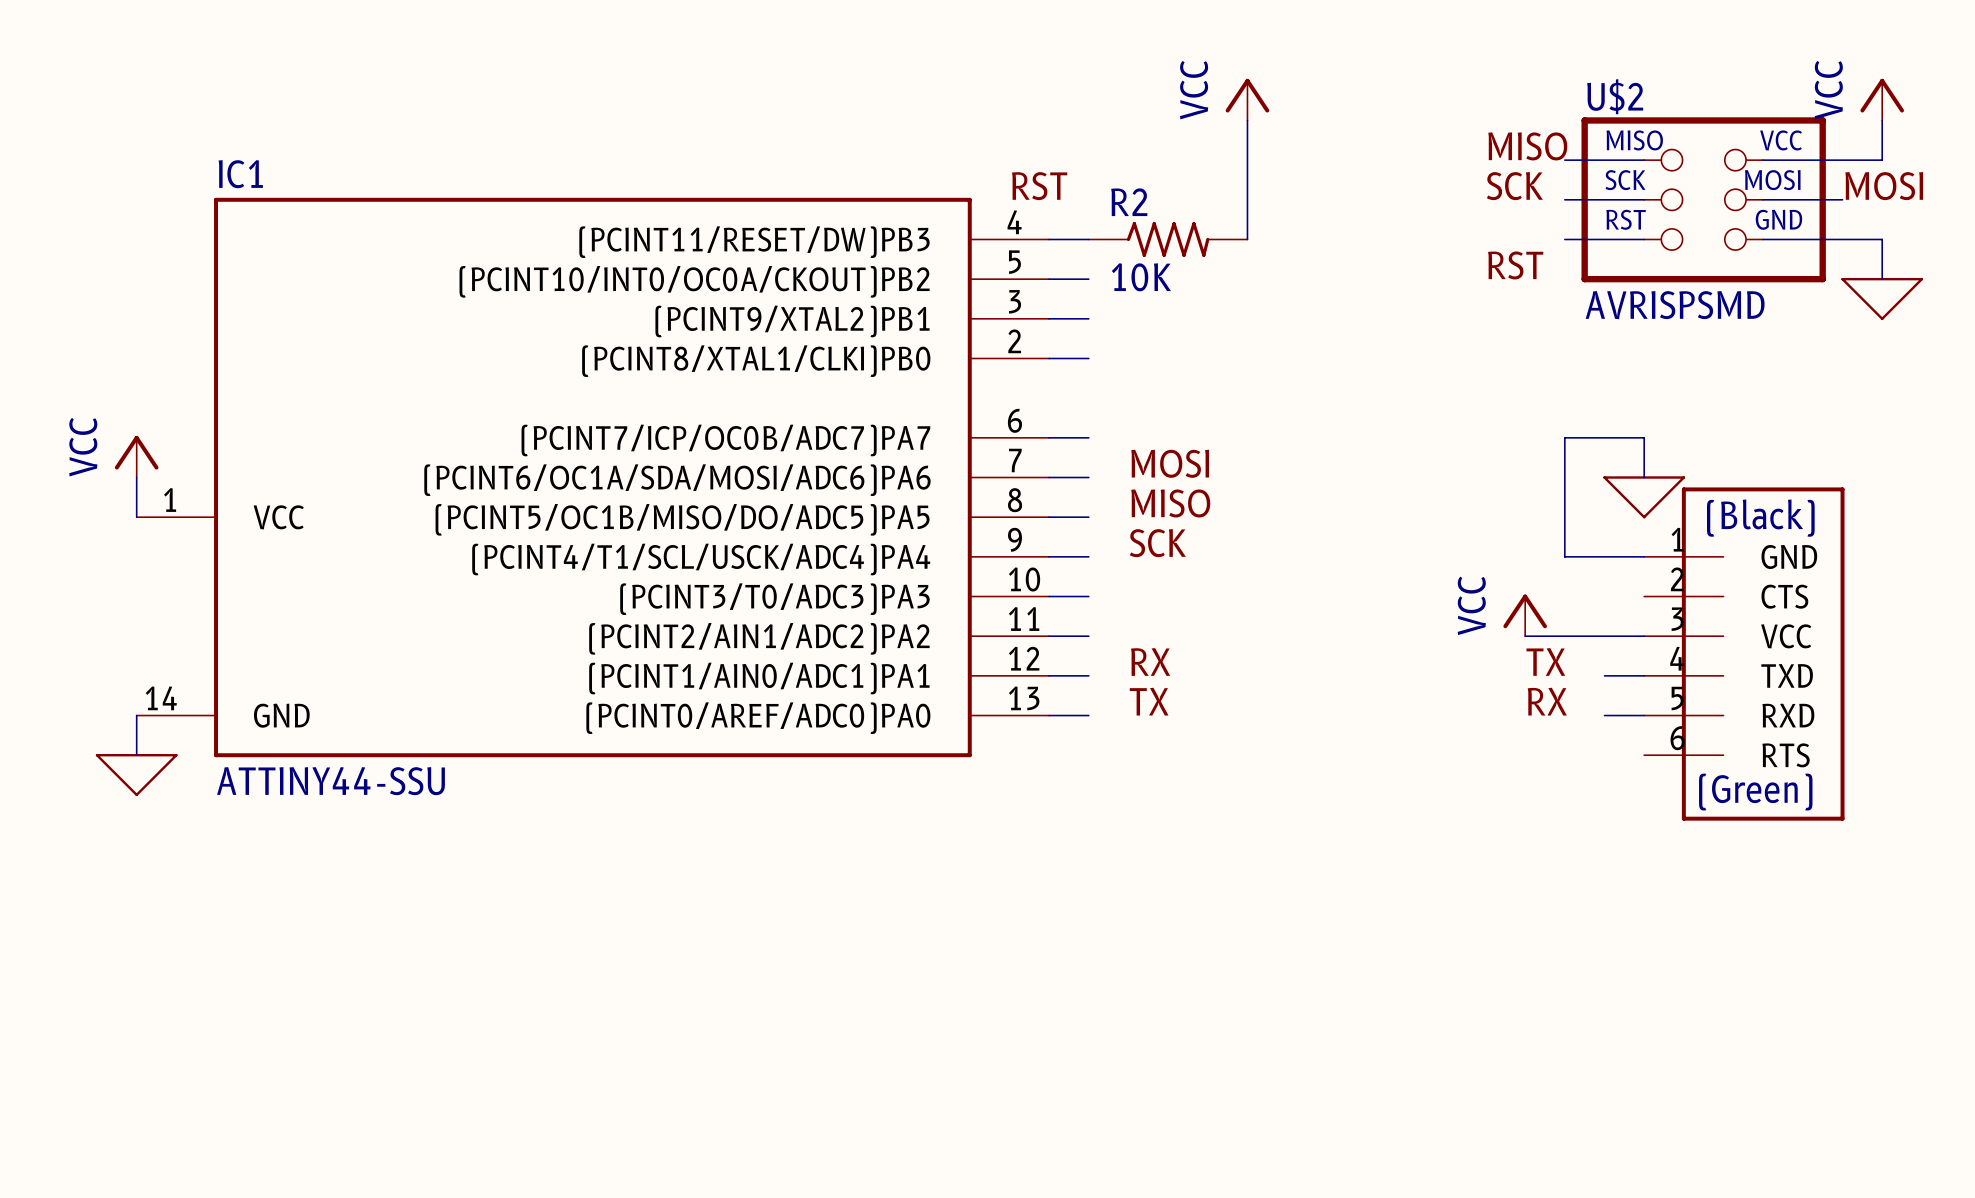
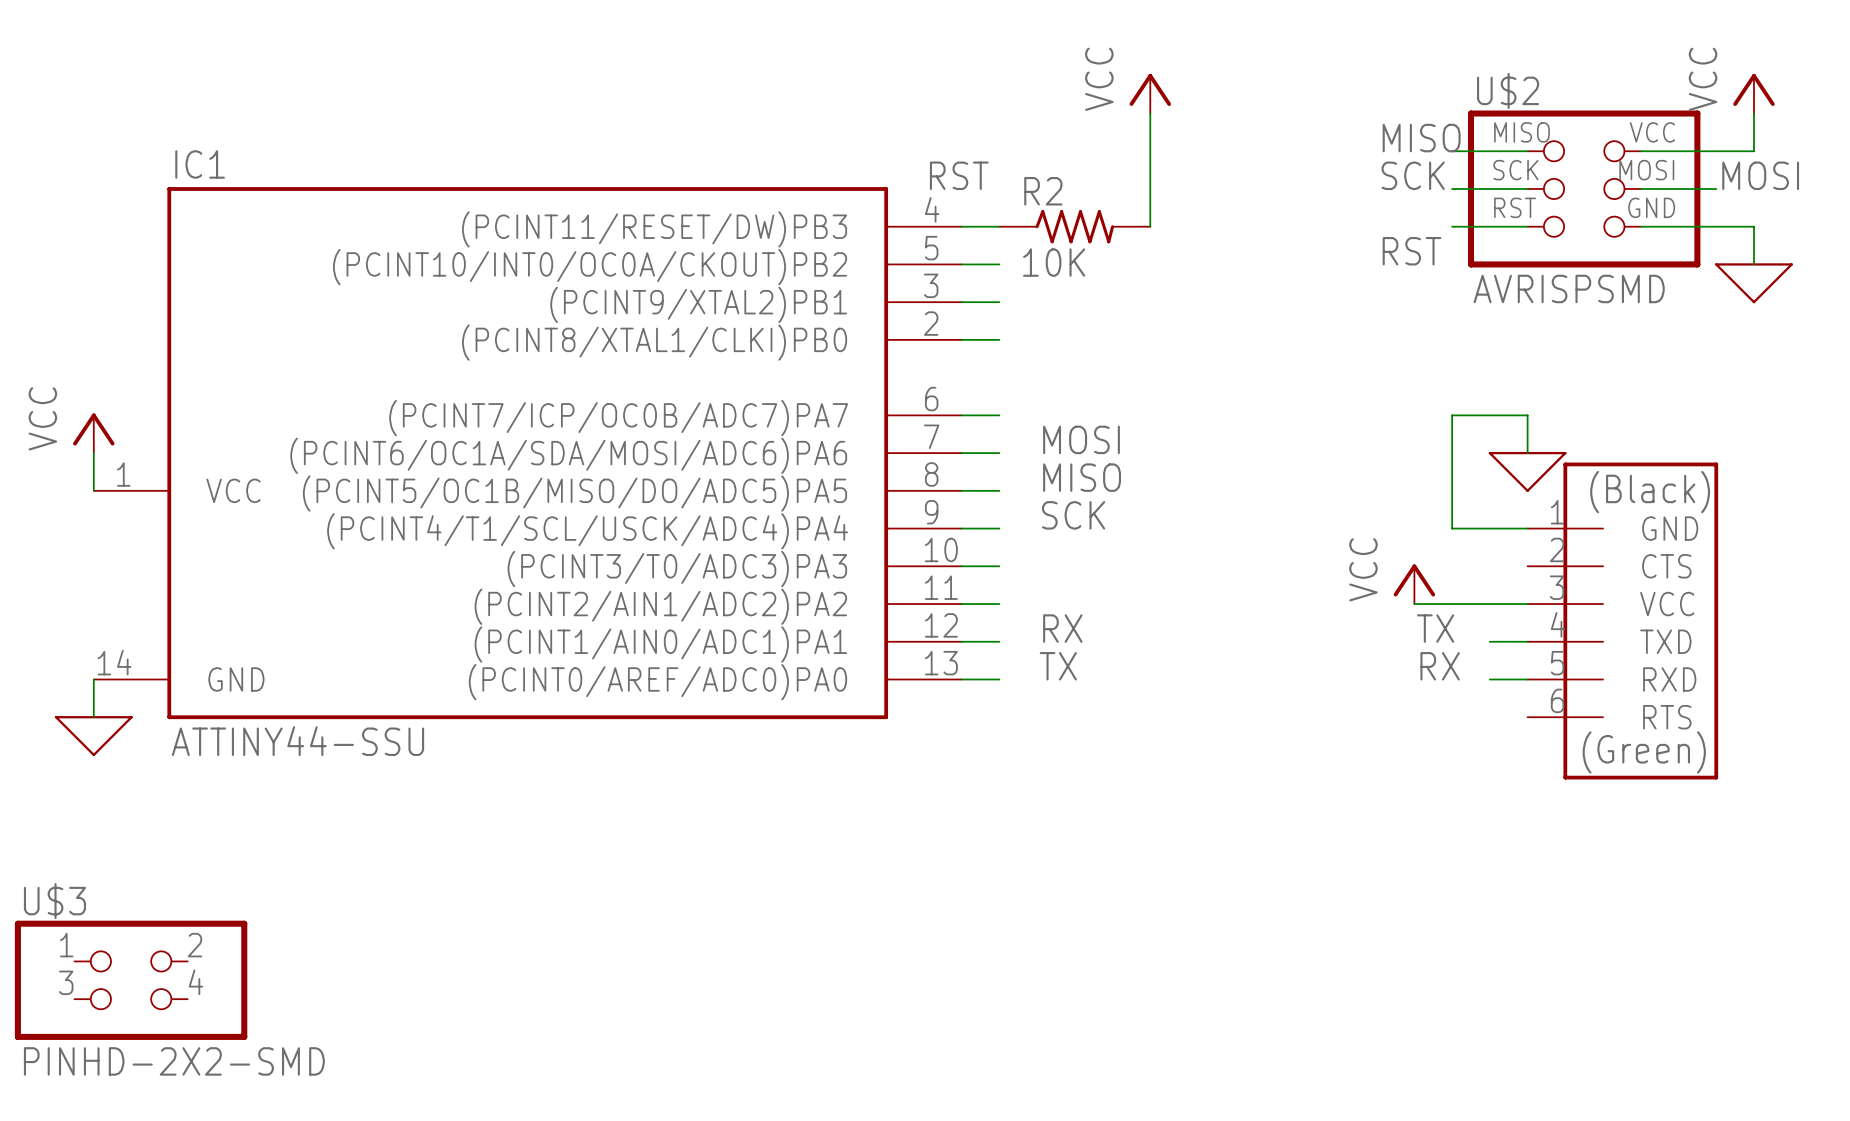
U$3: none -> PINHD-2X2-SMD (131, 980)

